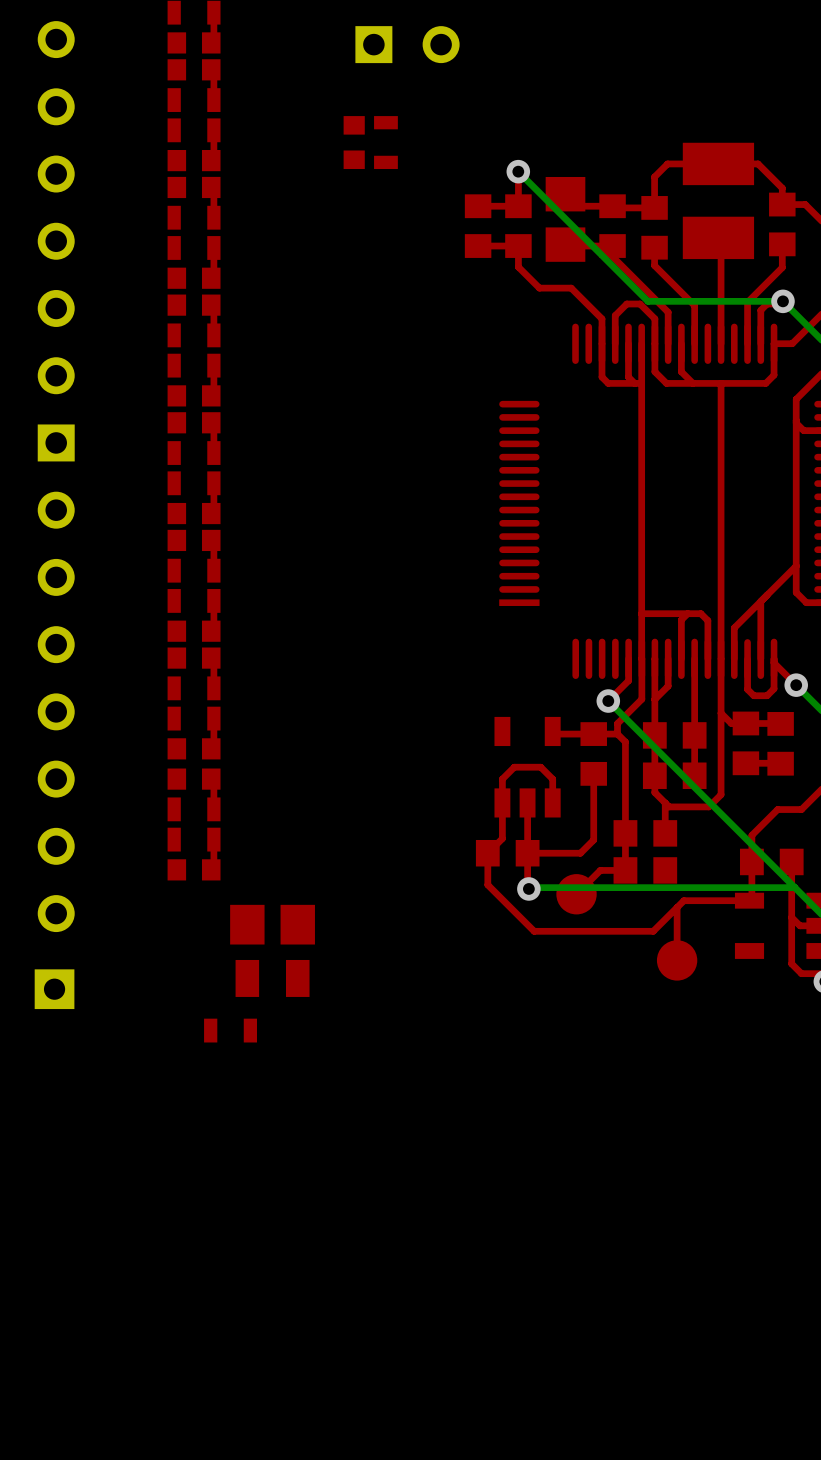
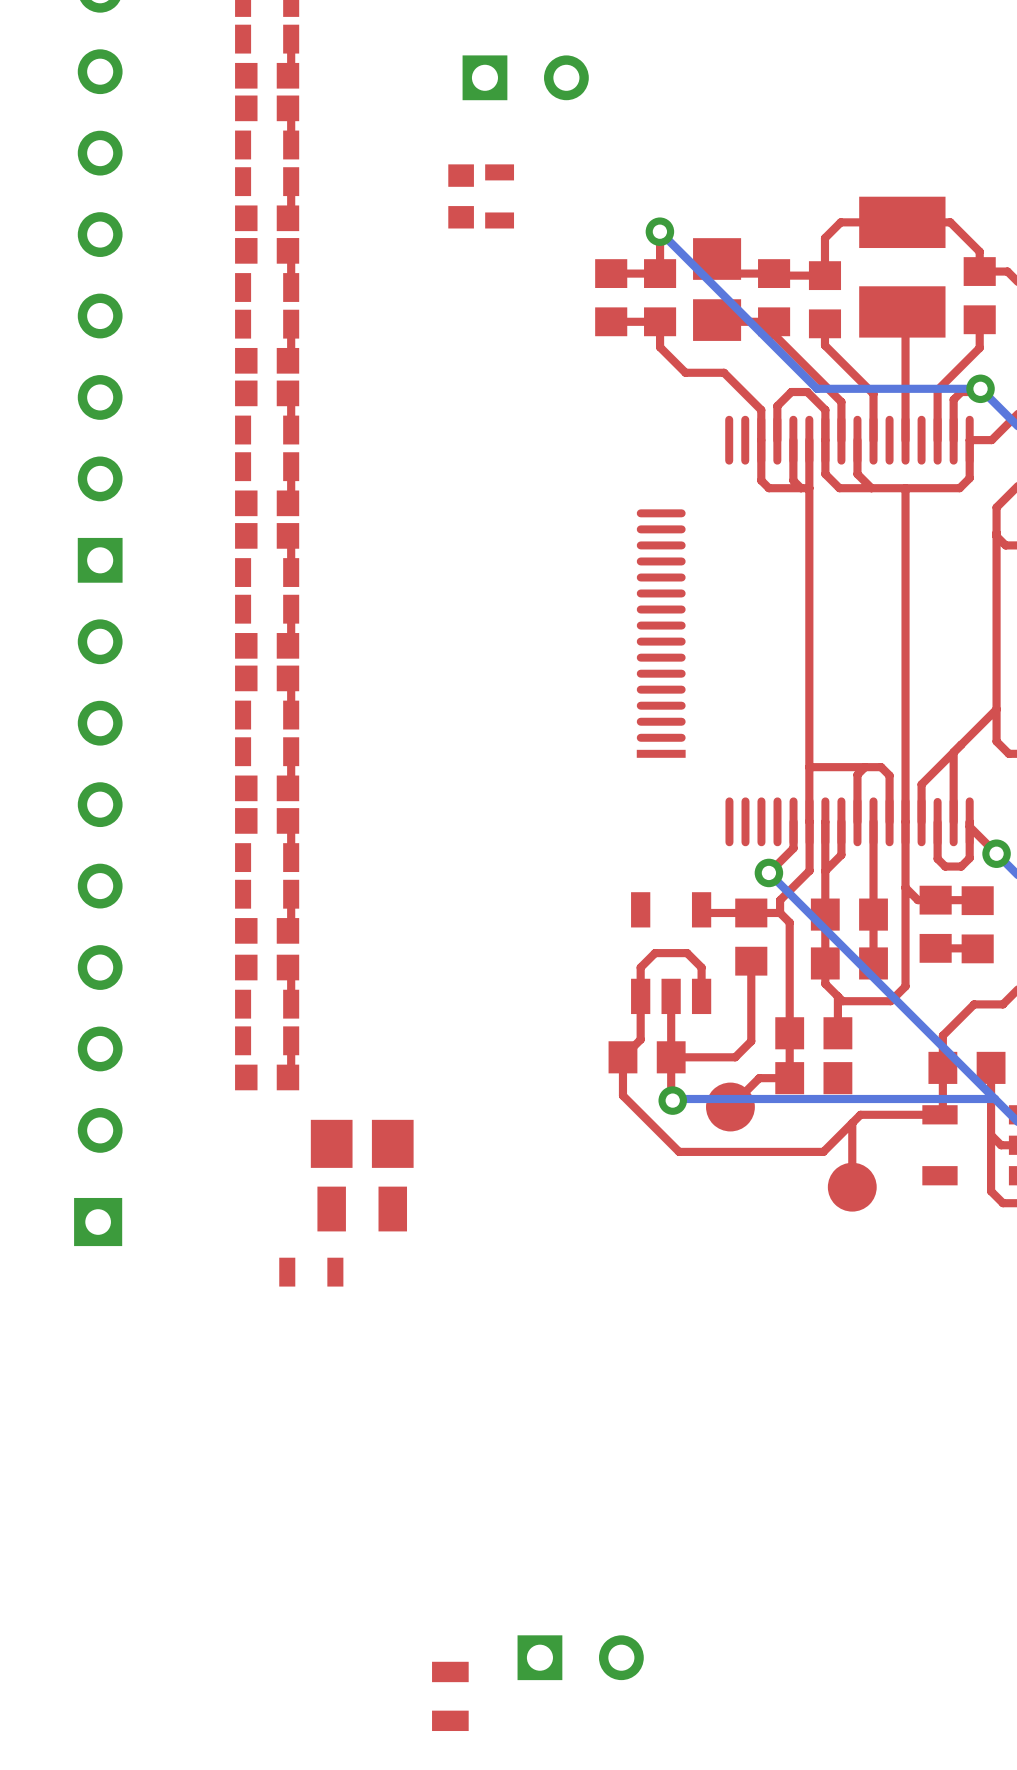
part: none -> (580, 1657)
part: none -> (450, 1696)

